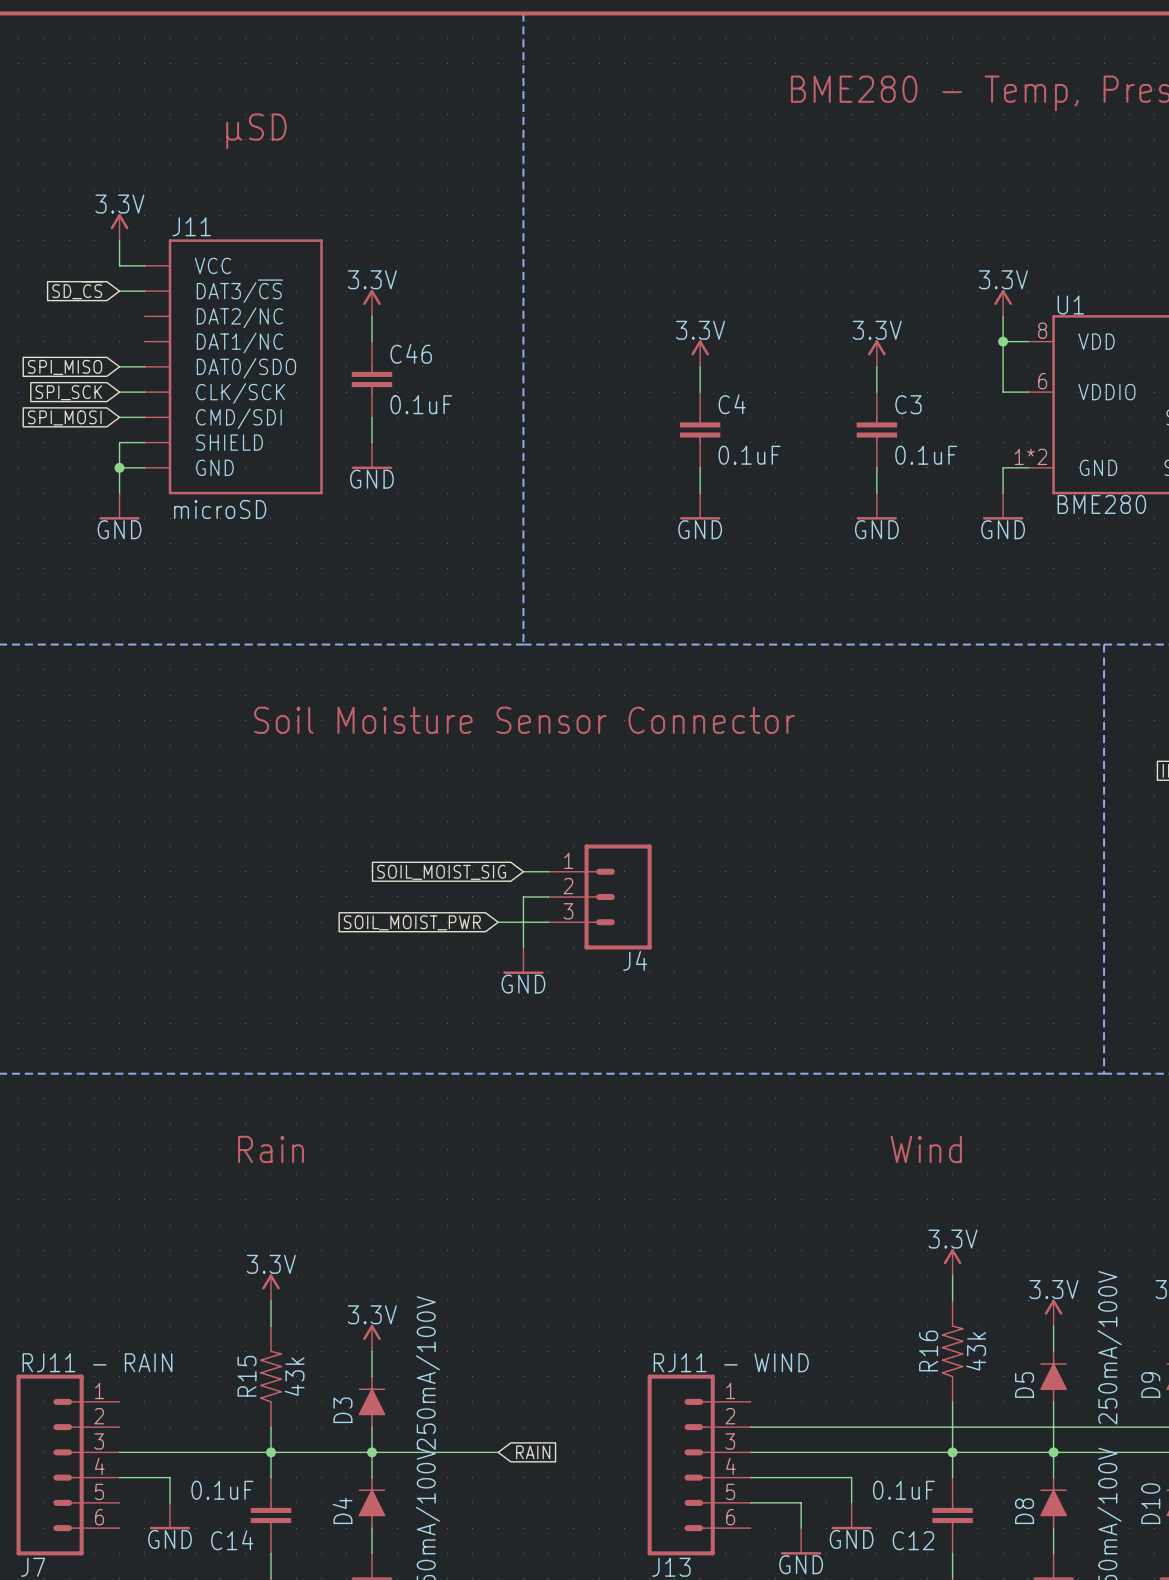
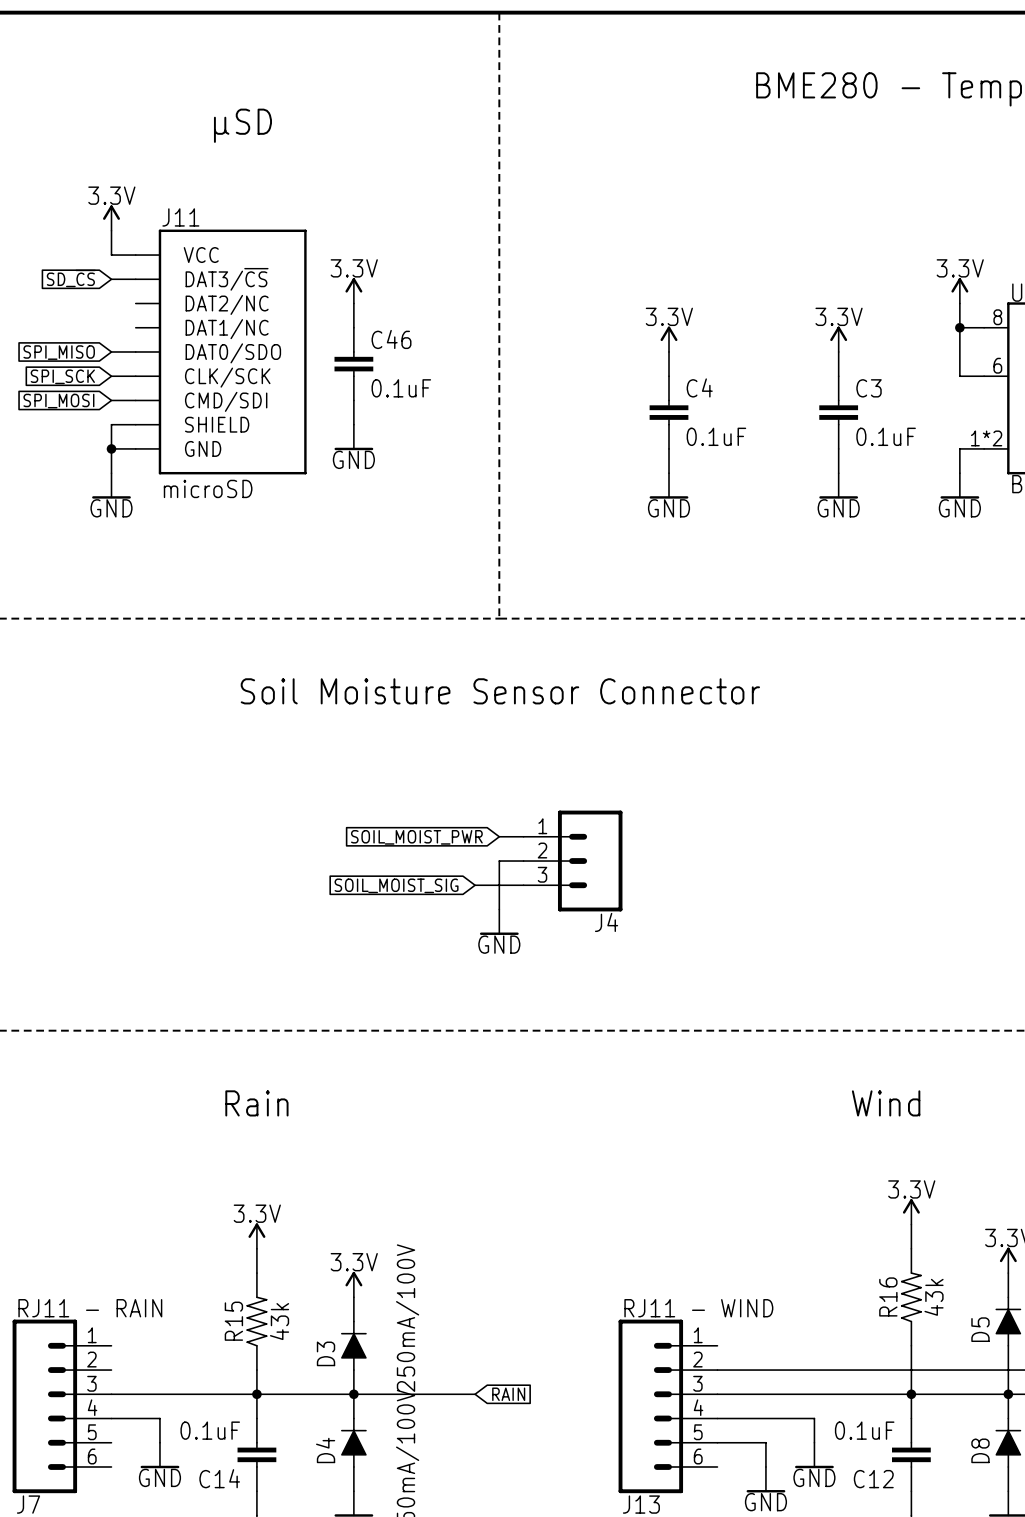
global label: SOIL_MOIST_SIG (441, 872) -> SOIL_MOIST_PWR (416, 837)
global label: SOIL_MOIST_PWR (412, 922) -> SOIL_MOIST_SIG (396, 885)

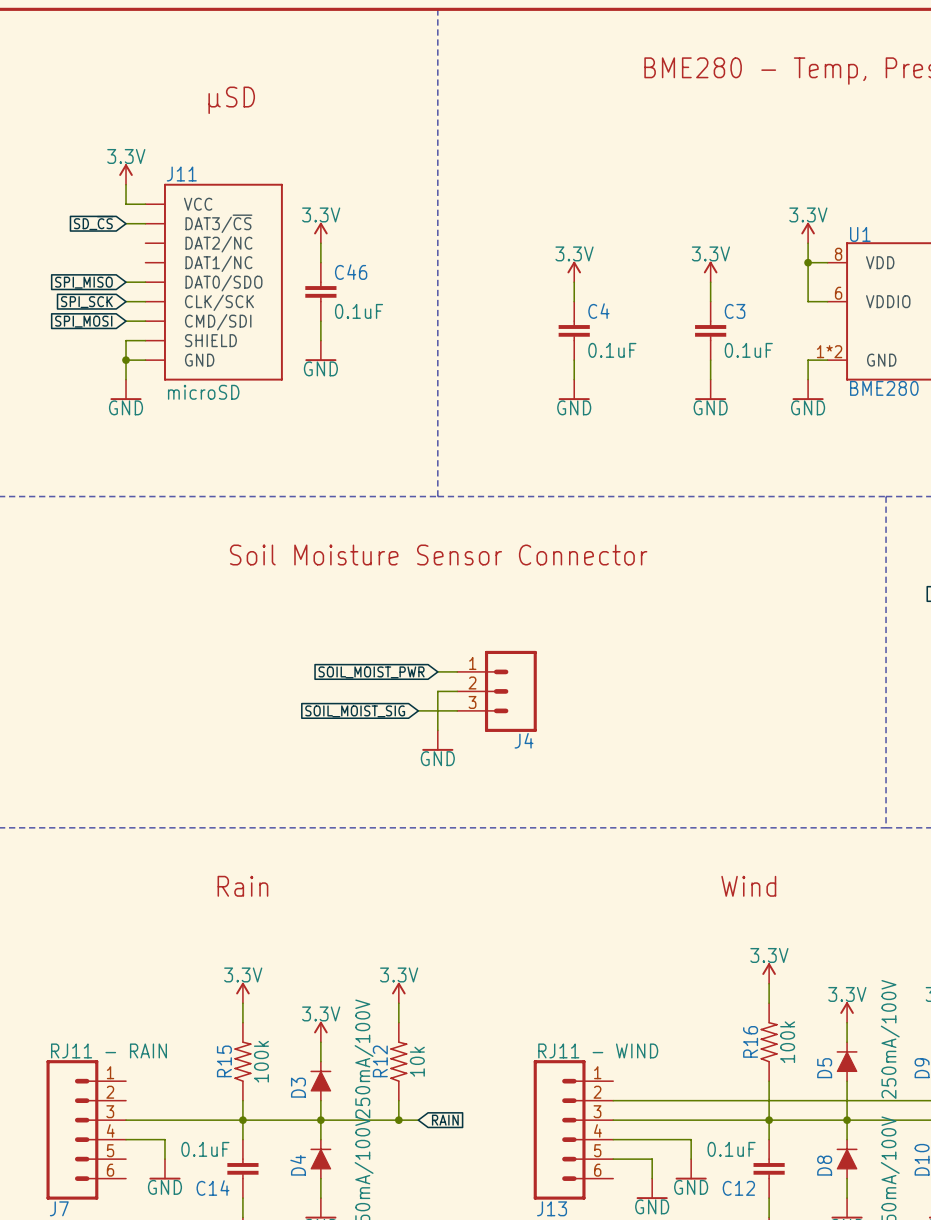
power symbol: none -> 3.3V (398, 992)
wire: none -> (398, 1003) (398, 1022)
R16 value: 43k (934, 1297) -> 100k (787, 1042)
R15 value: 43k (279, 1321) -> 100k (261, 1061)
R12: none -> 10k (398, 1061)
wire: none -> (398, 1100) (398, 1120)
junction: none -> (398, 1120)

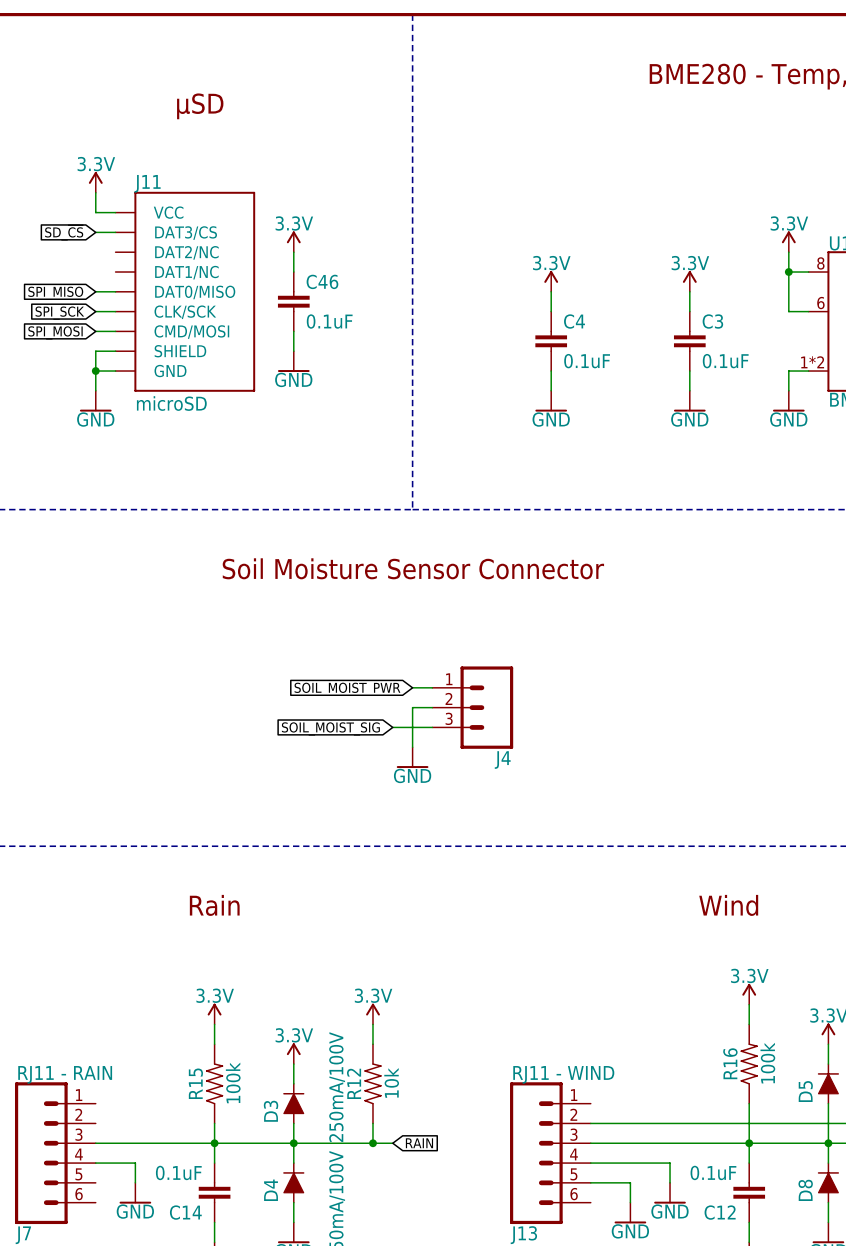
J11 pin name: DAT3/~{CS} (218, 223) -> DAT3/CS (186, 233)
J11 pin name: DAT0/SDO (223, 283) -> DAT0/MISO (195, 292)
J11 pin name: CMD/SDI (218, 322) -> CMD/MOSI (191, 332)

